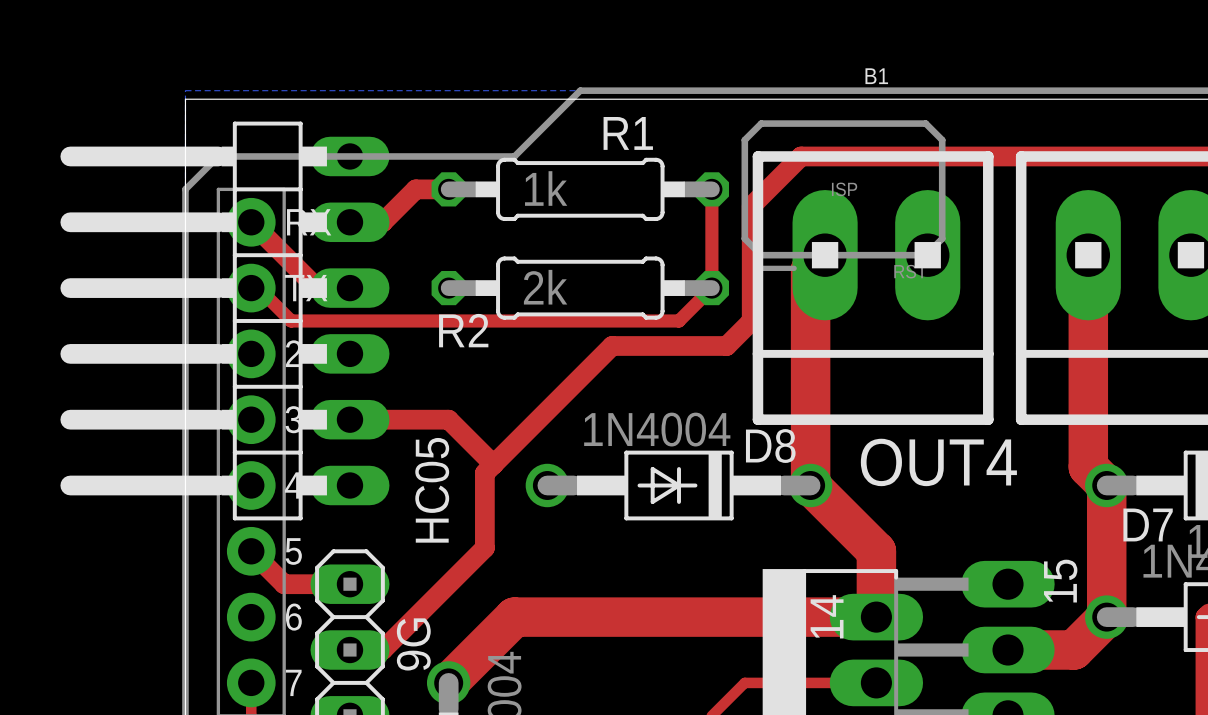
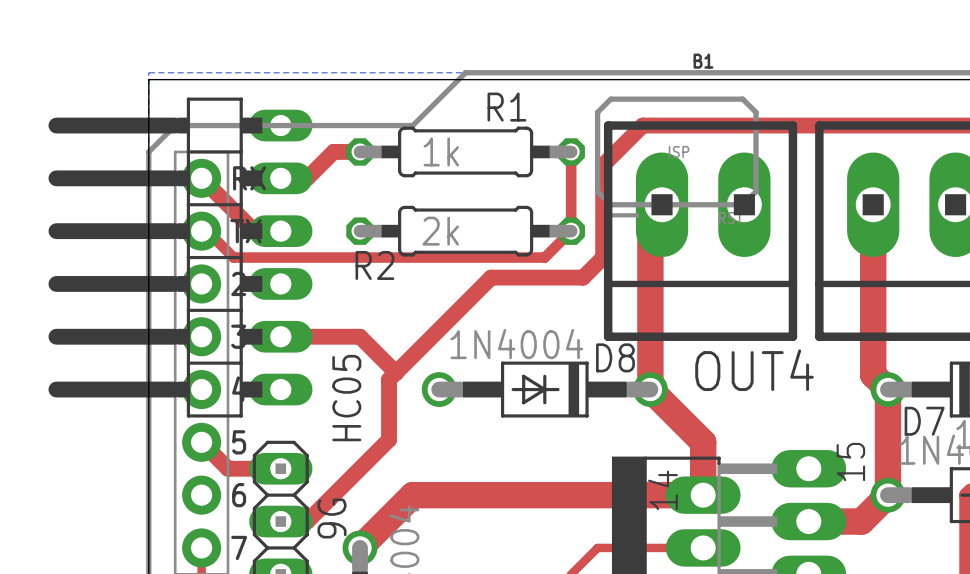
top track width: thick (825, 255) (810, 269) (810, 485) (876, 551) (876, 617) (514, 617) (448, 682) -> thin (662, 204) (650, 216) (650, 389) (703, 442) (703, 495) (412, 495) (360, 547)
top track width: thick (1088, 255) (1088, 467) (1106, 485) (1106, 617) (1073, 650) (1008, 650) -> thin (873, 204) (873, 374) (887, 389) (887, 495) (861, 521) (808, 521)

